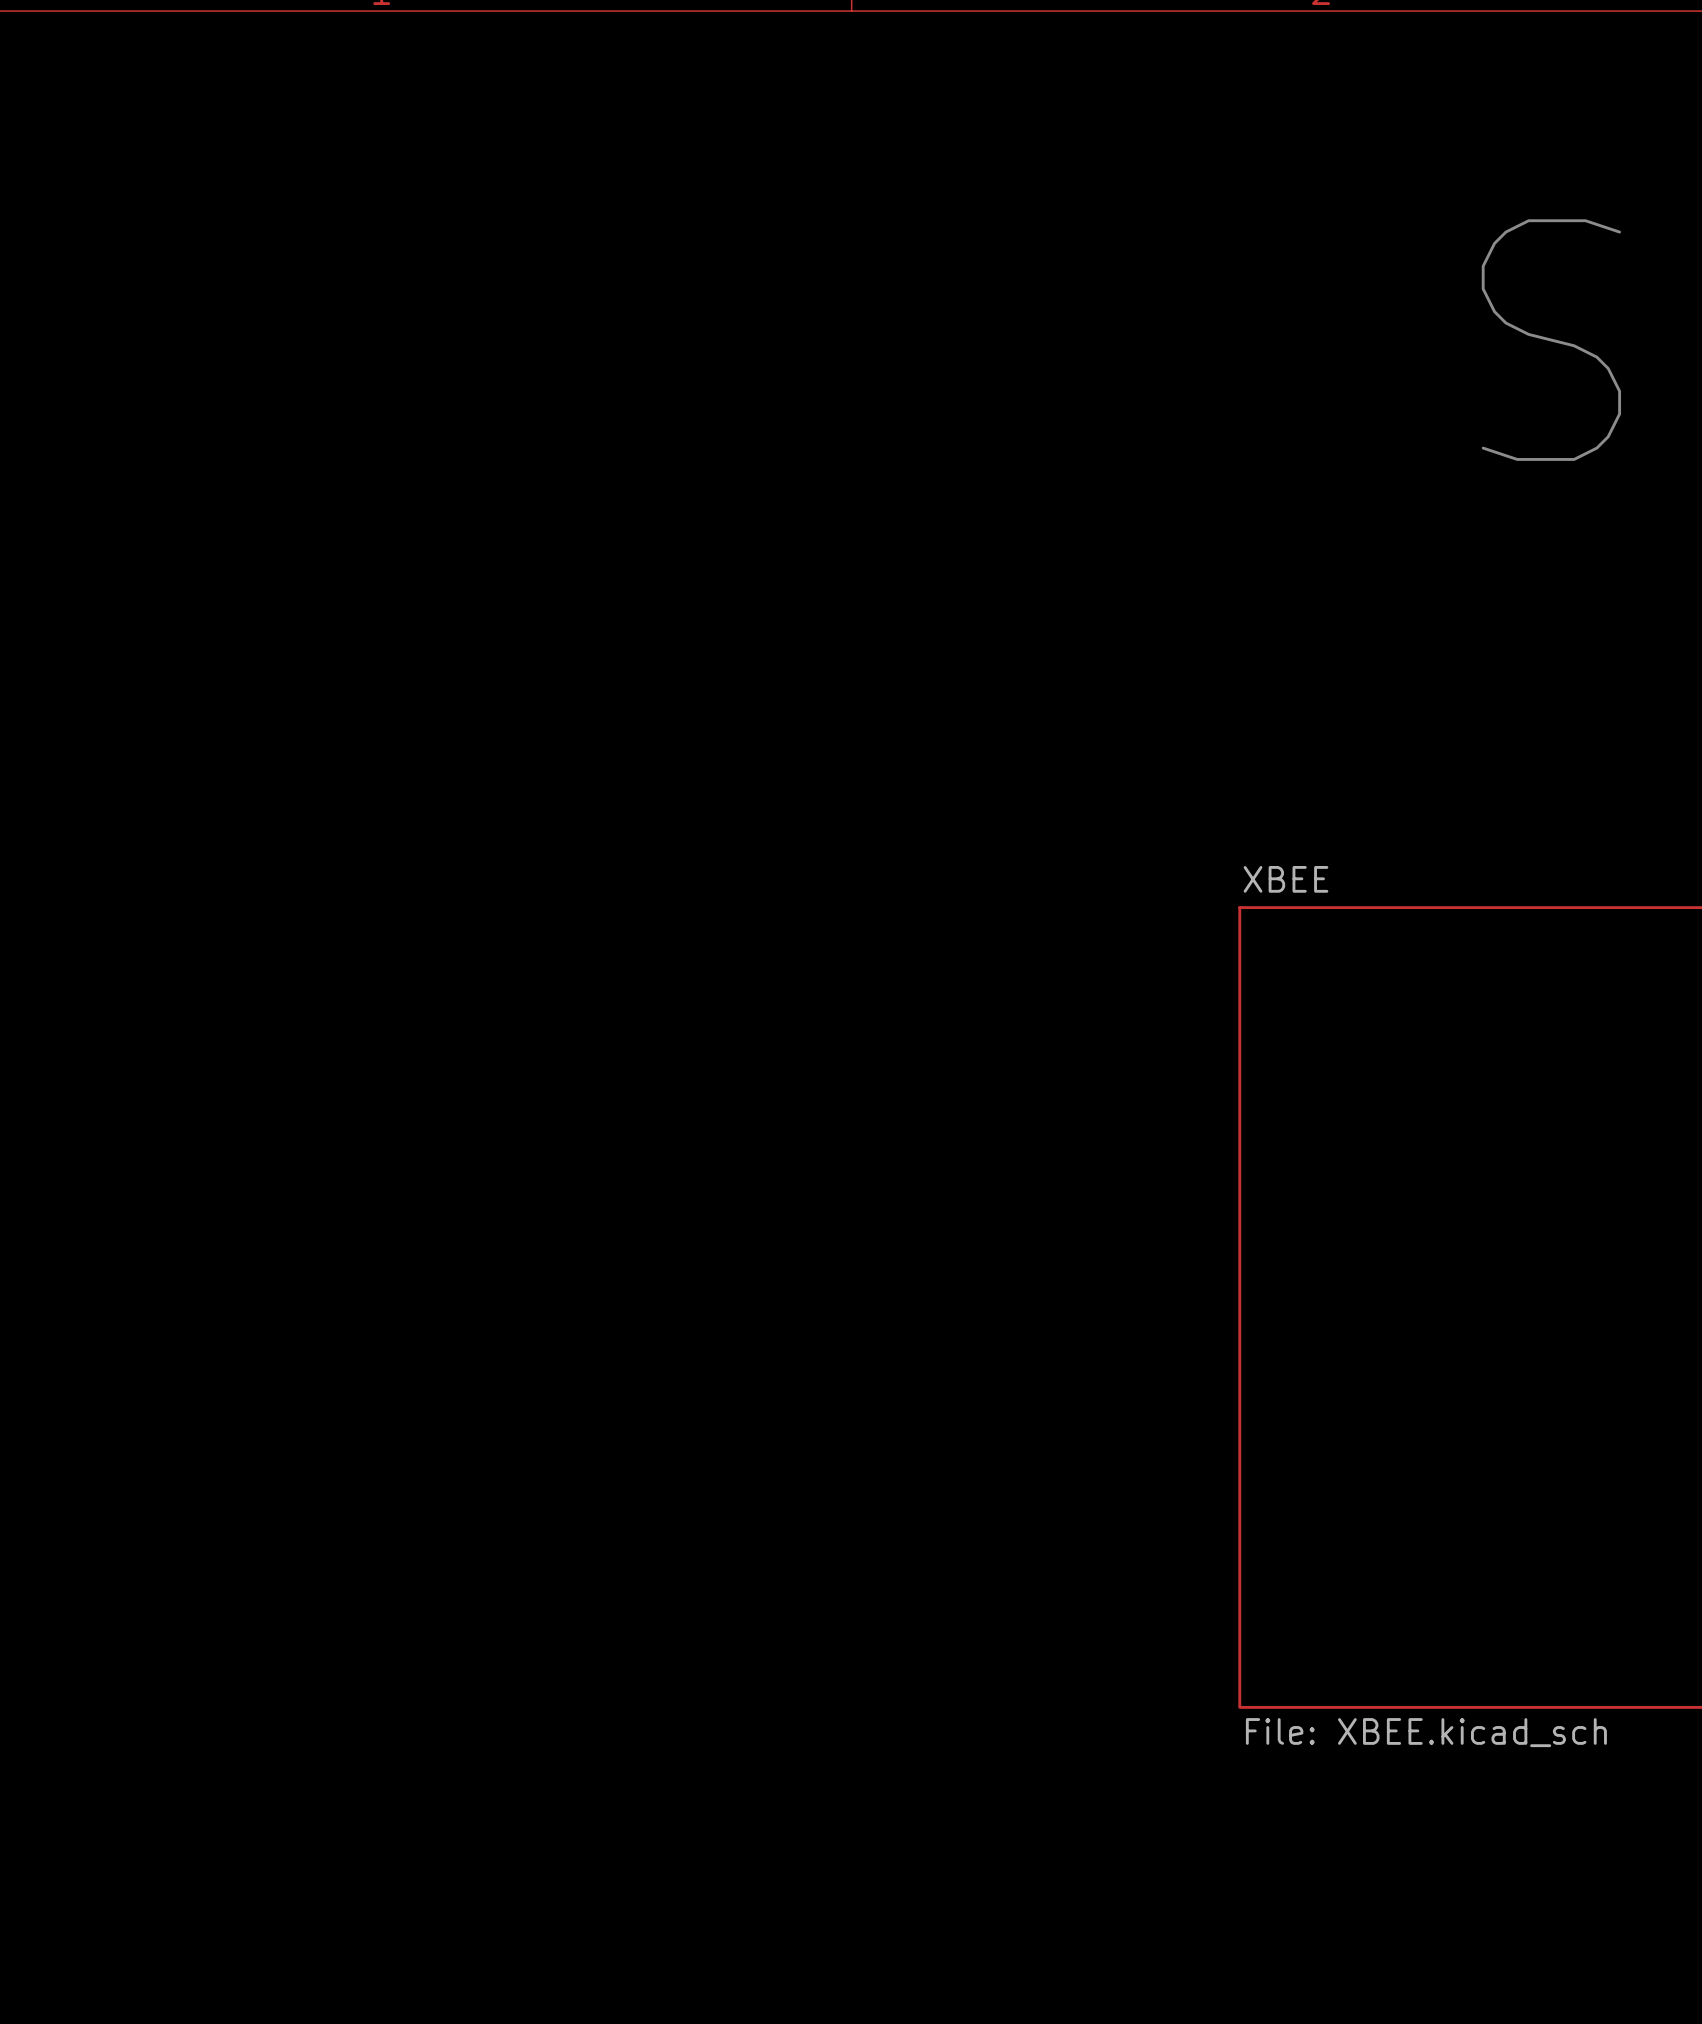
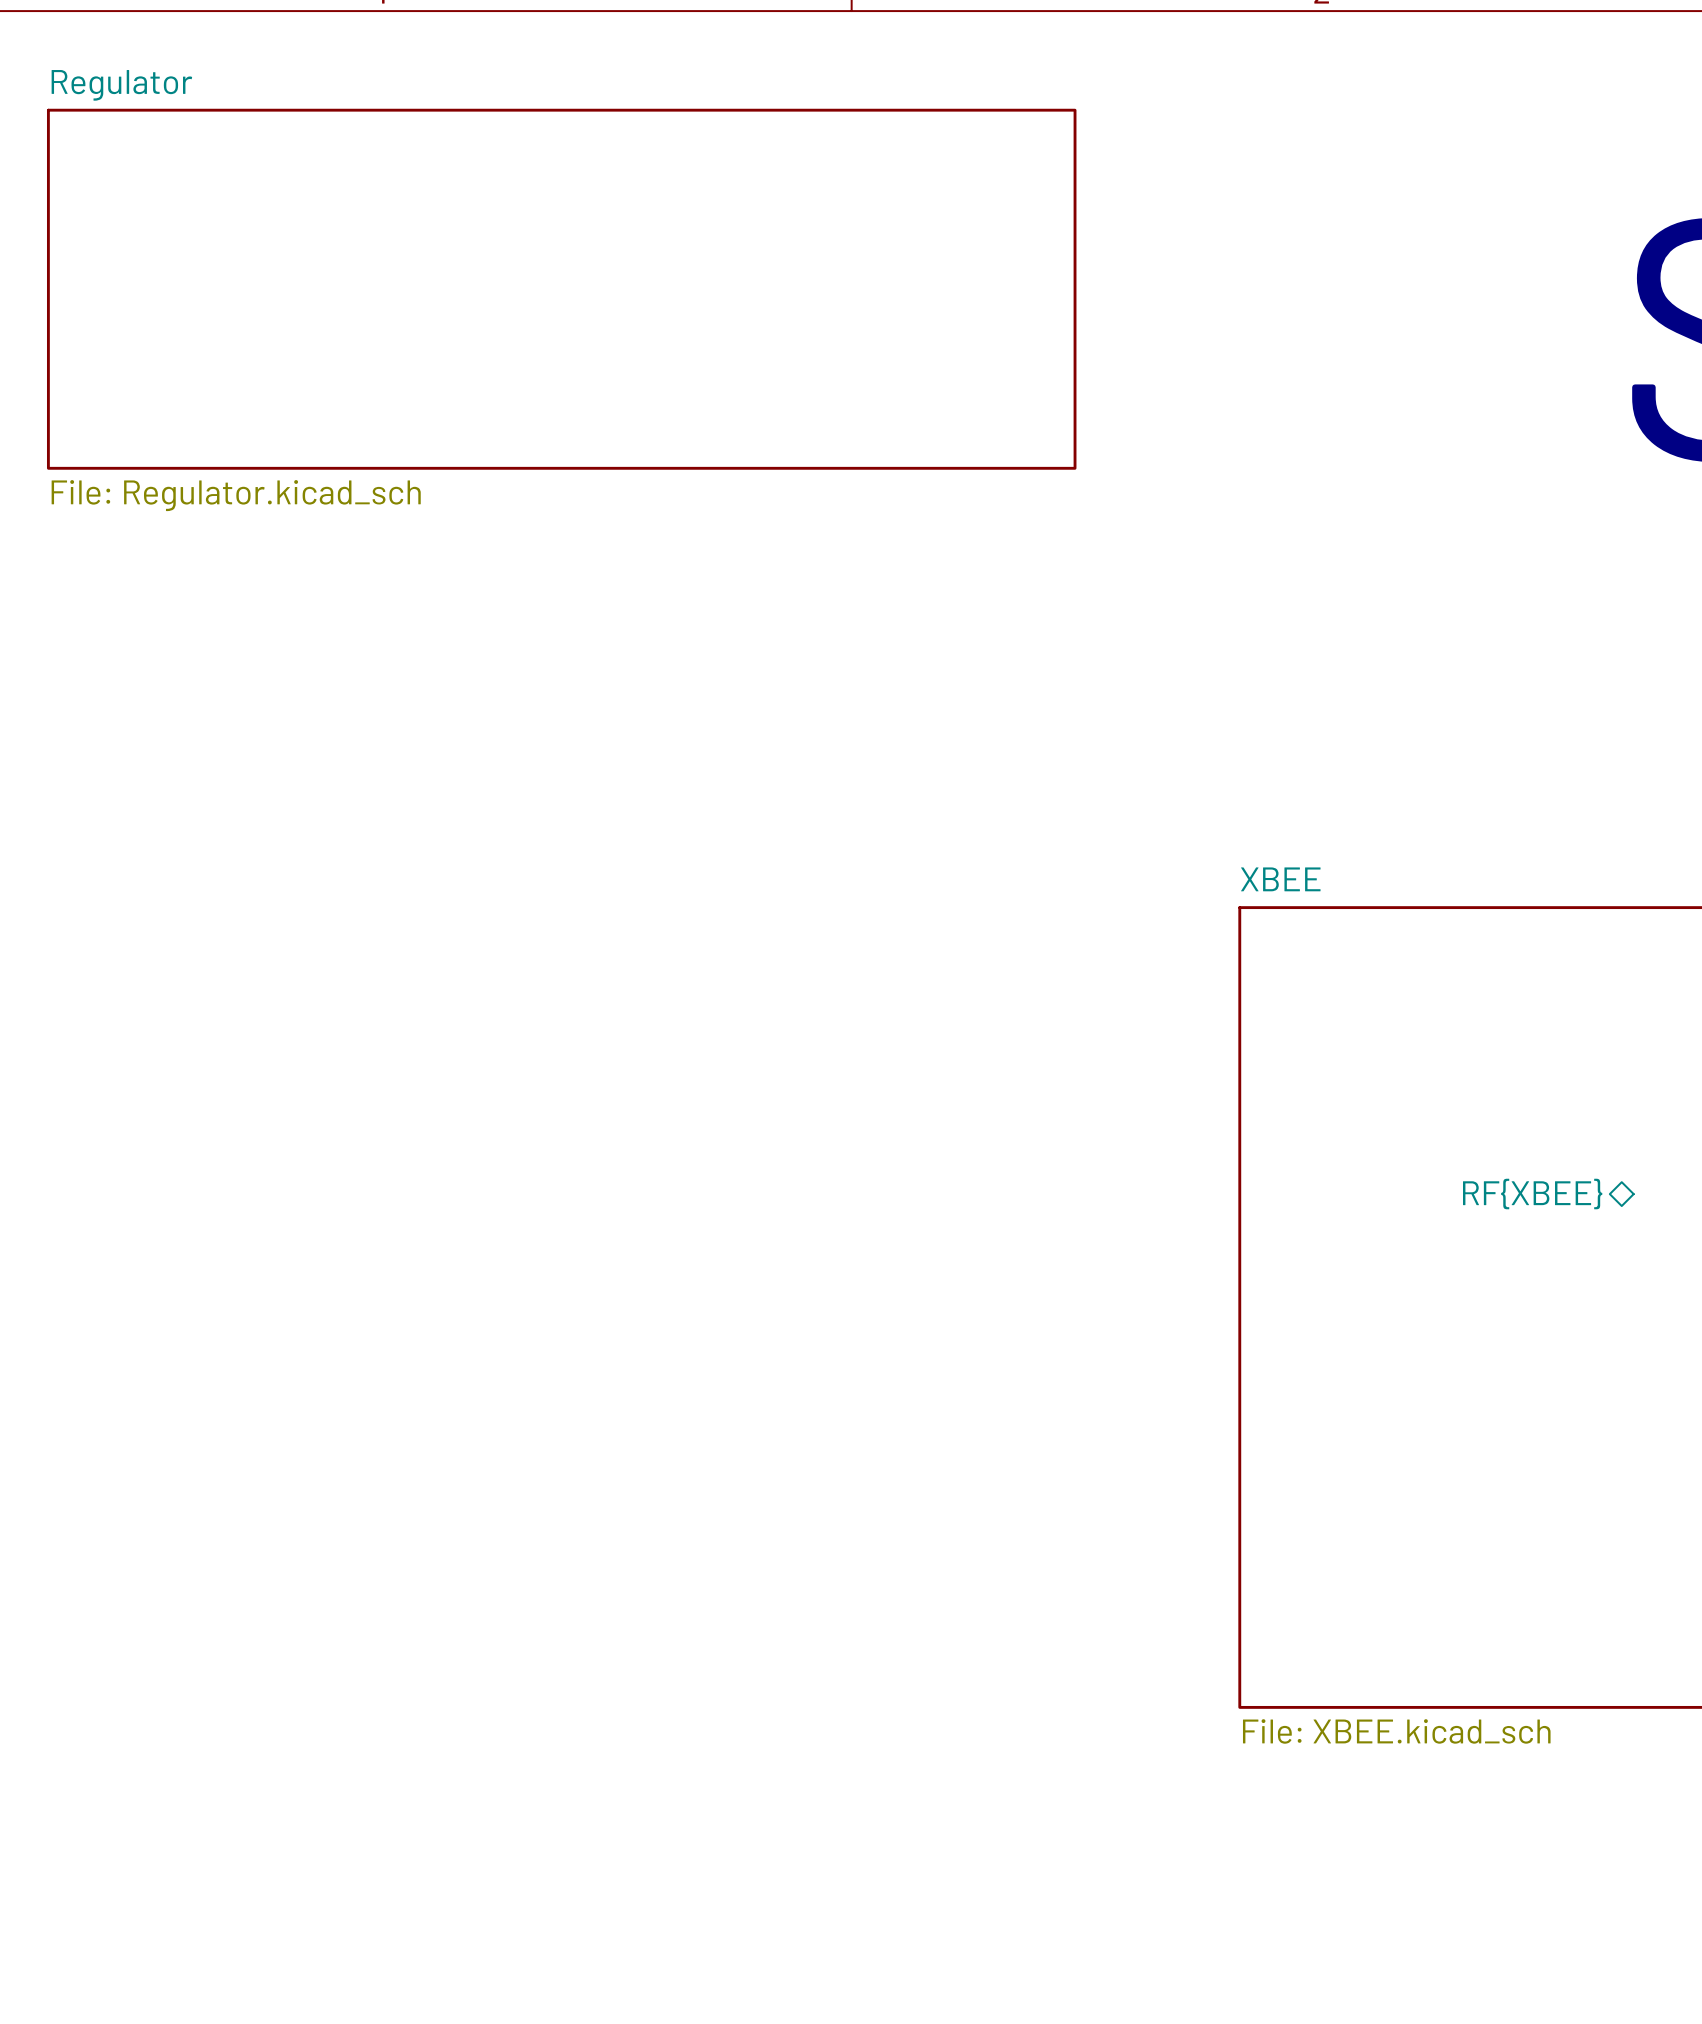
sheet Regulator: none -> File: Regulator.kicad_sch (561, 289)
sheet pin: none -> RF{XBEE} (1532, 1194)

